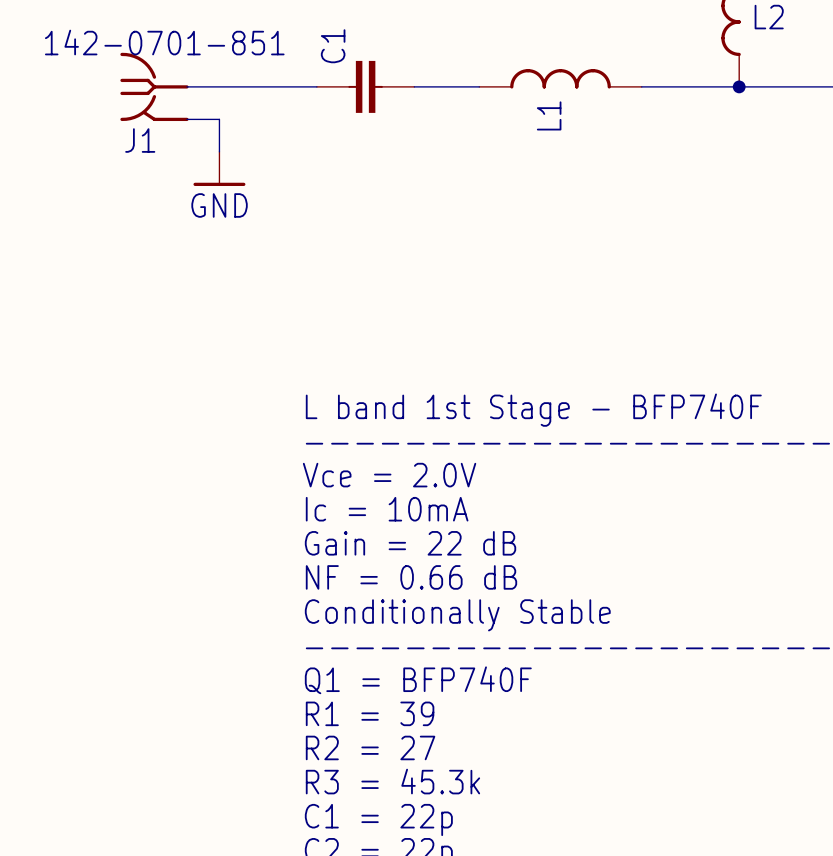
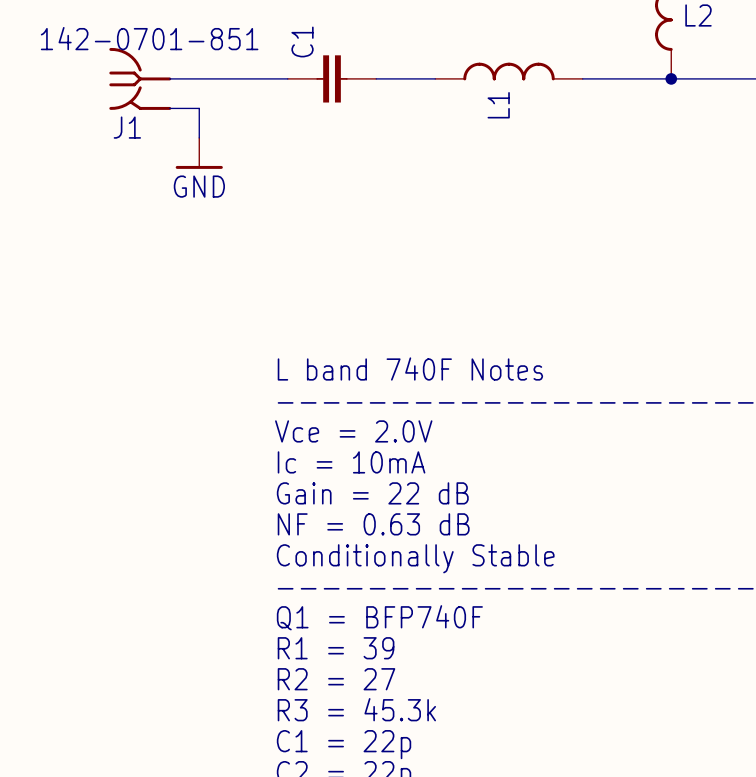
text: L band 1st Stage - BFP740F (533, 410) -> L band 740F Notes (410, 369)
text: NF = 0.66 dB (411, 577) -> NF = 0.63 dB (373, 524)

